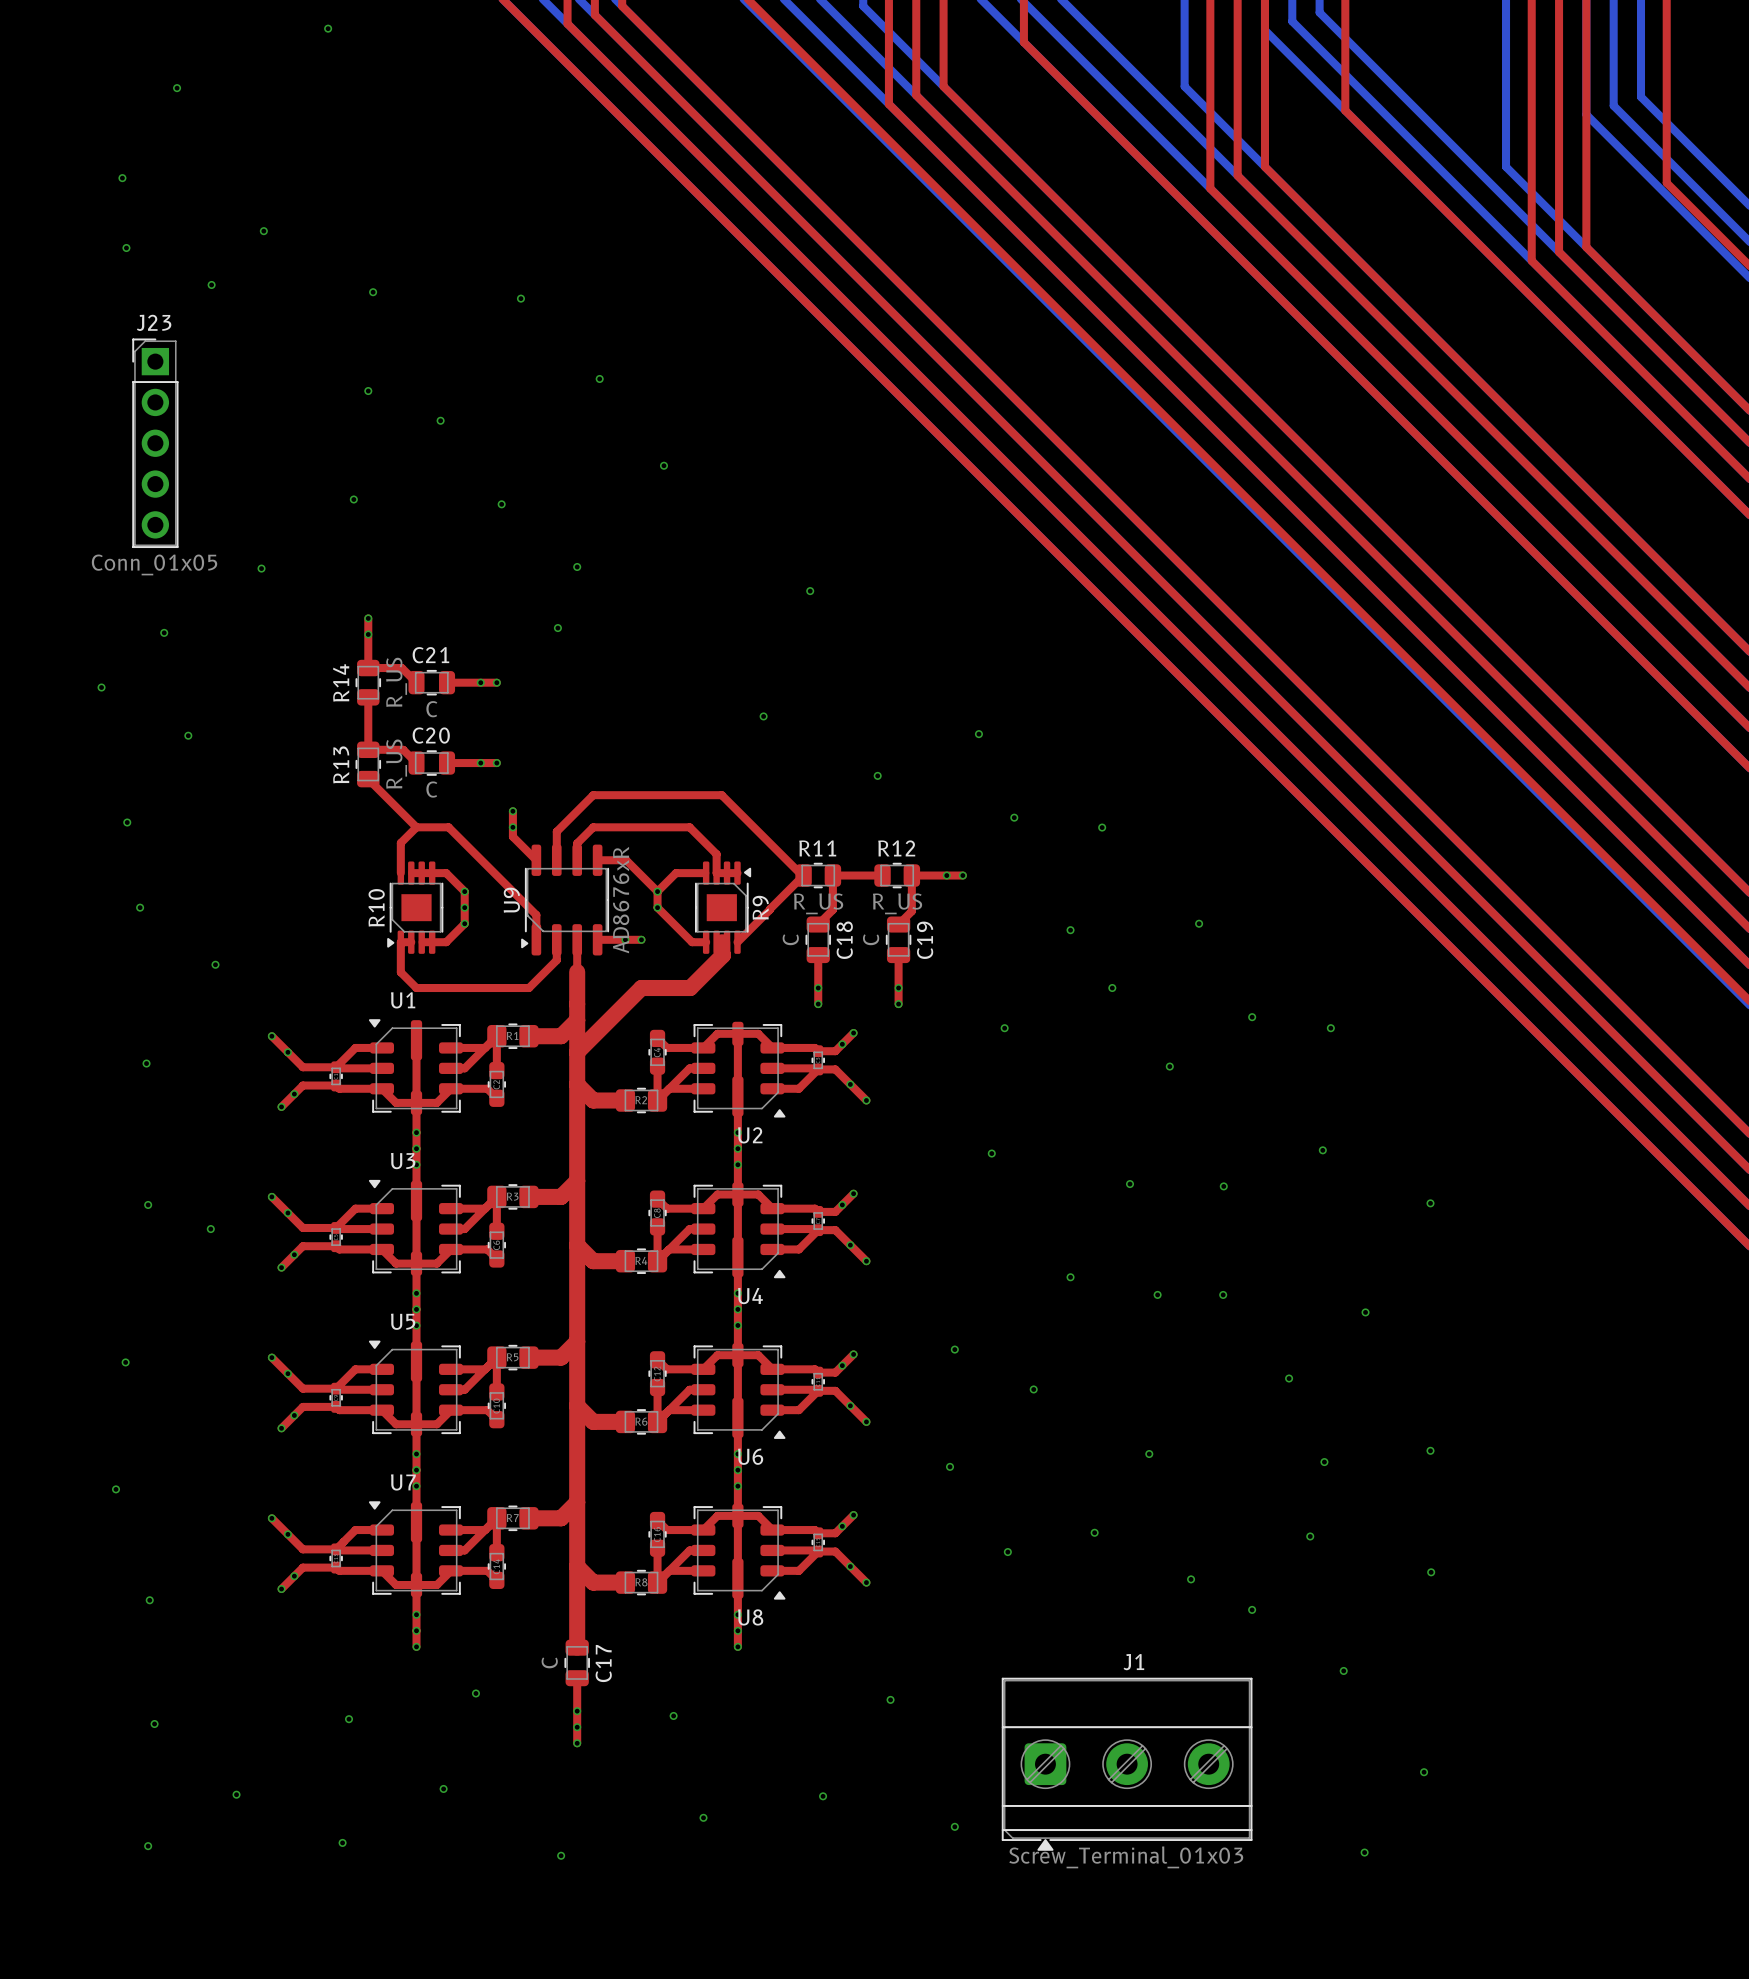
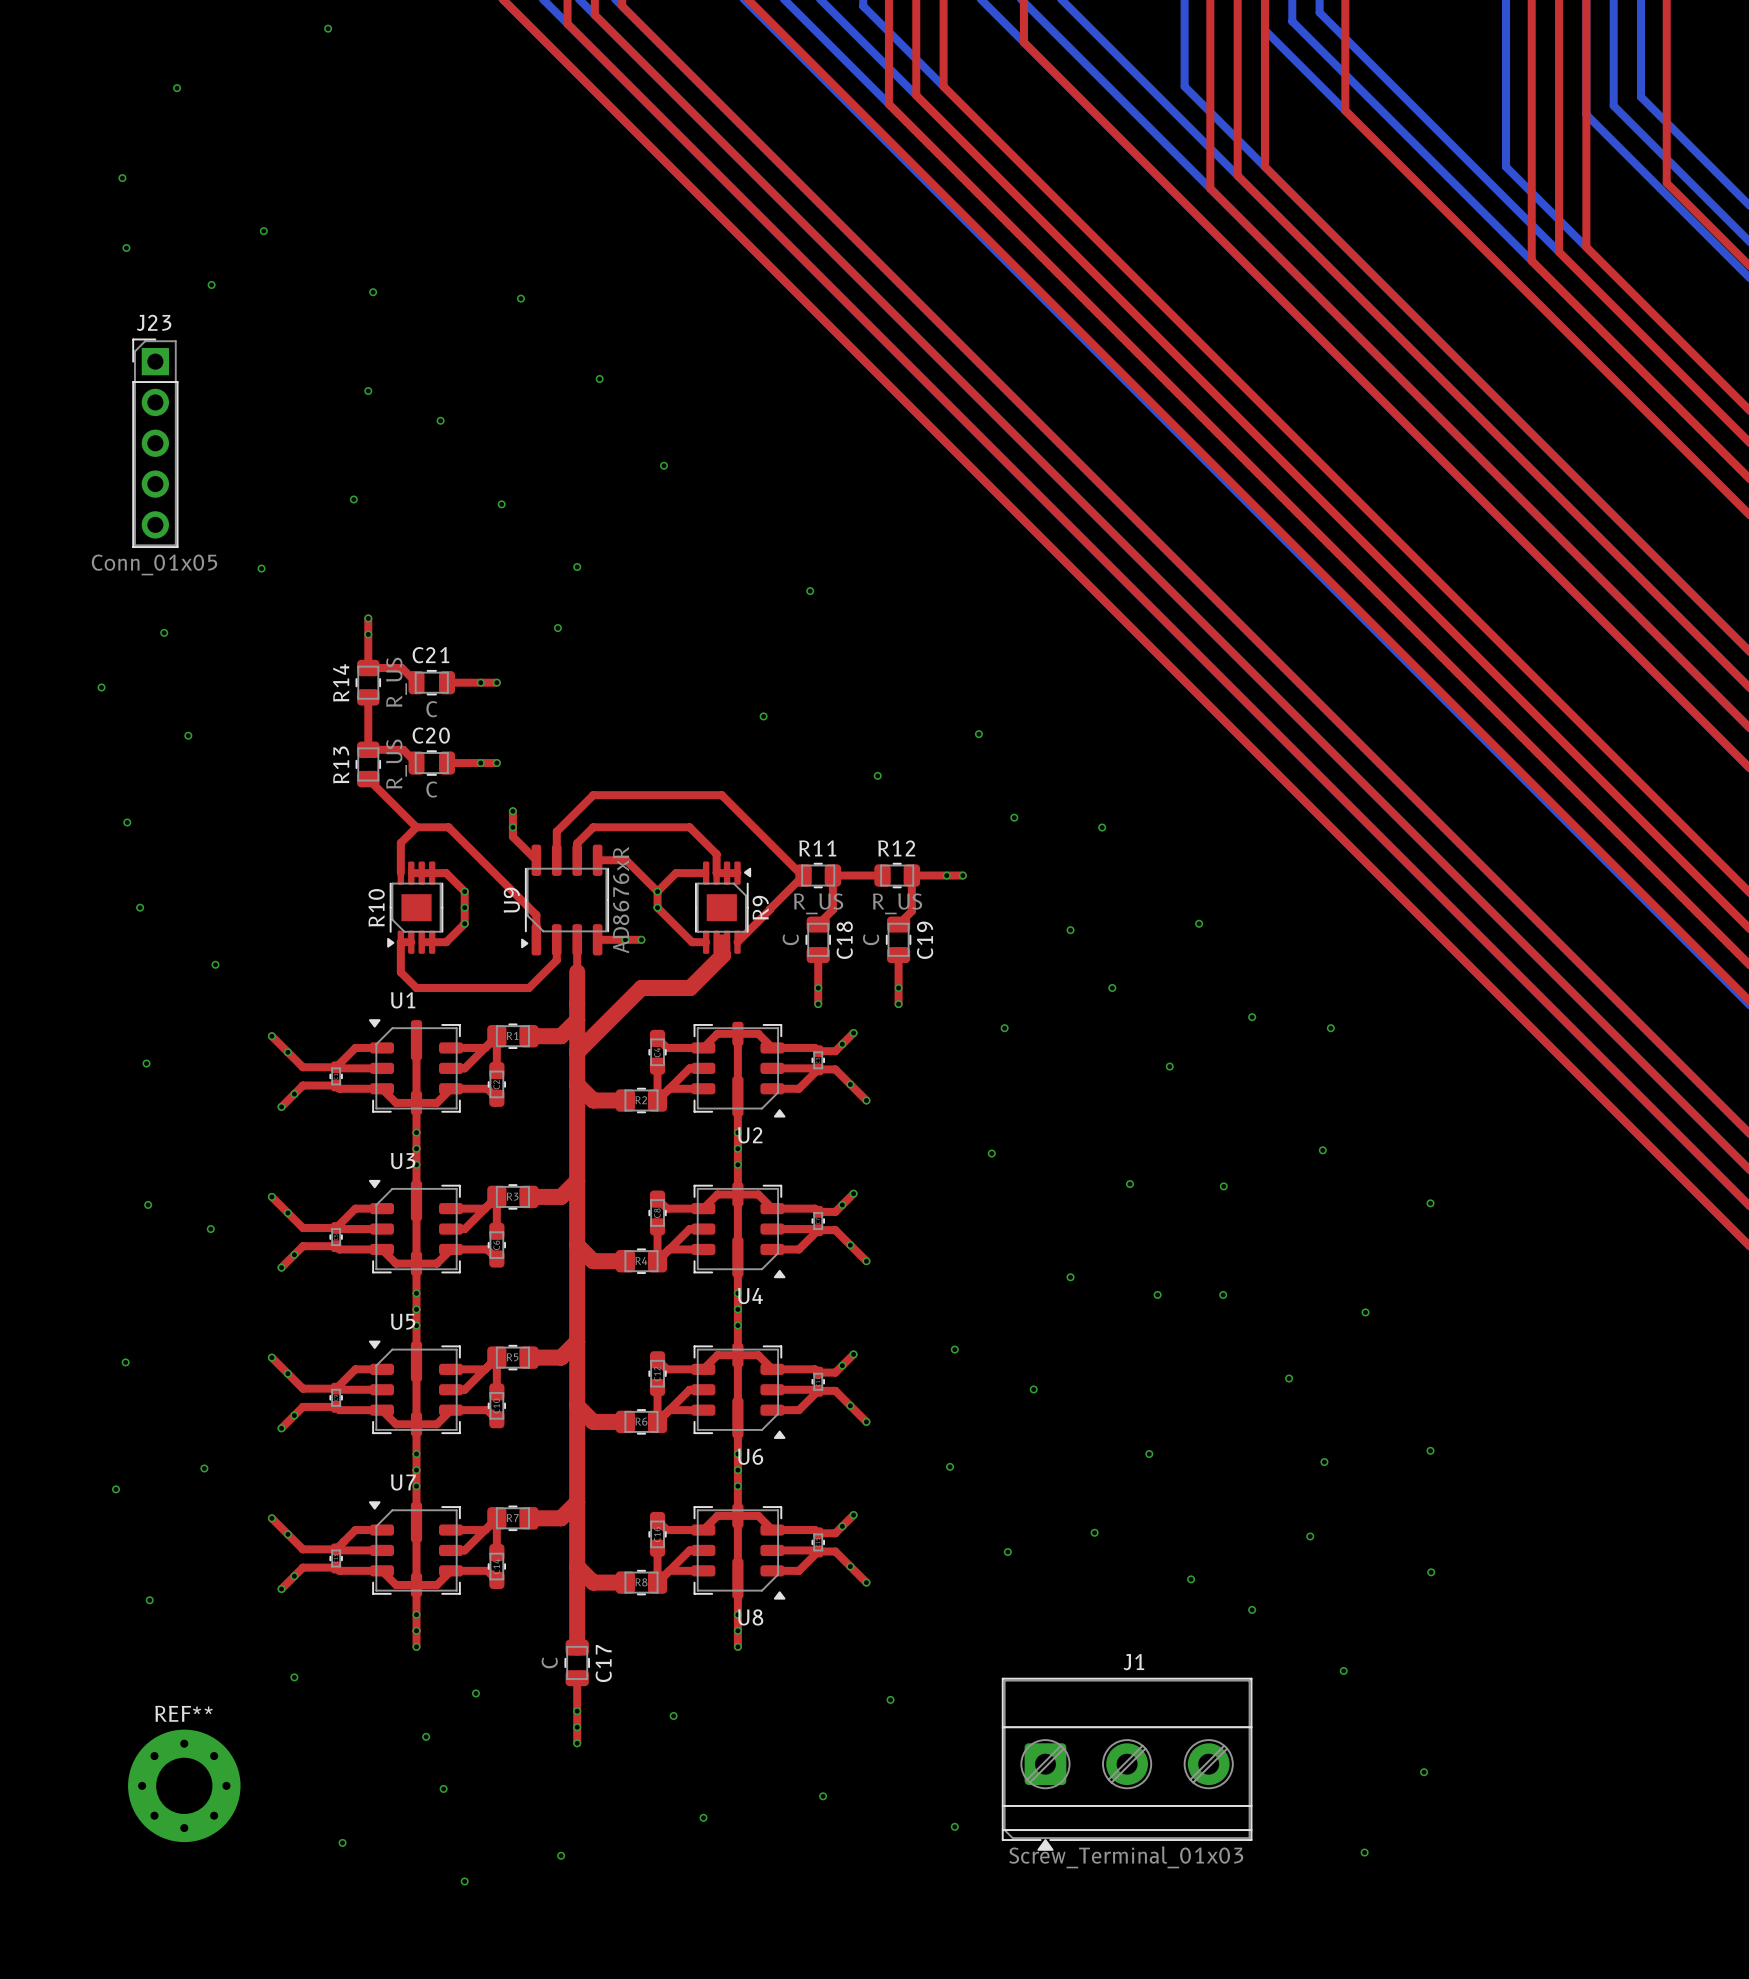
via: none -> (204, 1468)
via: none -> (294, 1677)
via: (349, 1719) -> none
via: (154, 1724) -> none
via: none -> (426, 1736)
REF**: none -> (184, 1785)
via: (236, 1794) -> none
via: (148, 1846) -> none
via: none -> (464, 1881)

